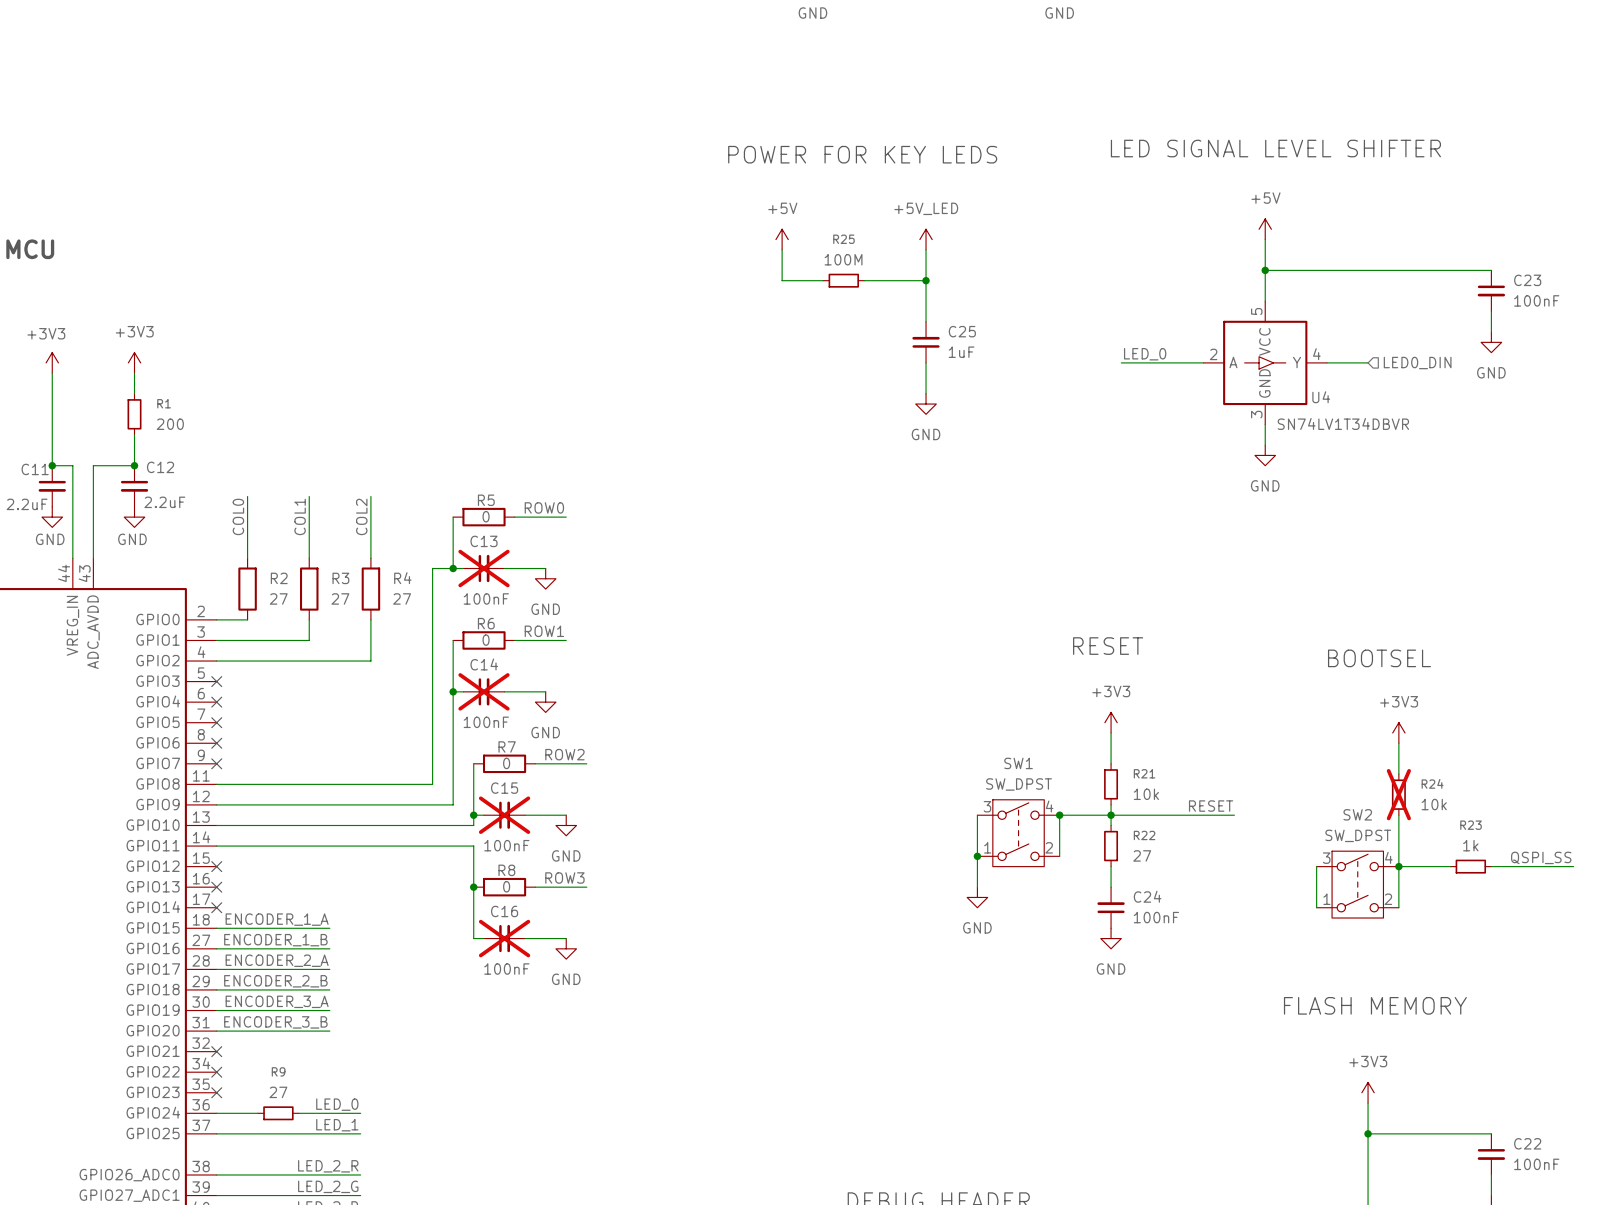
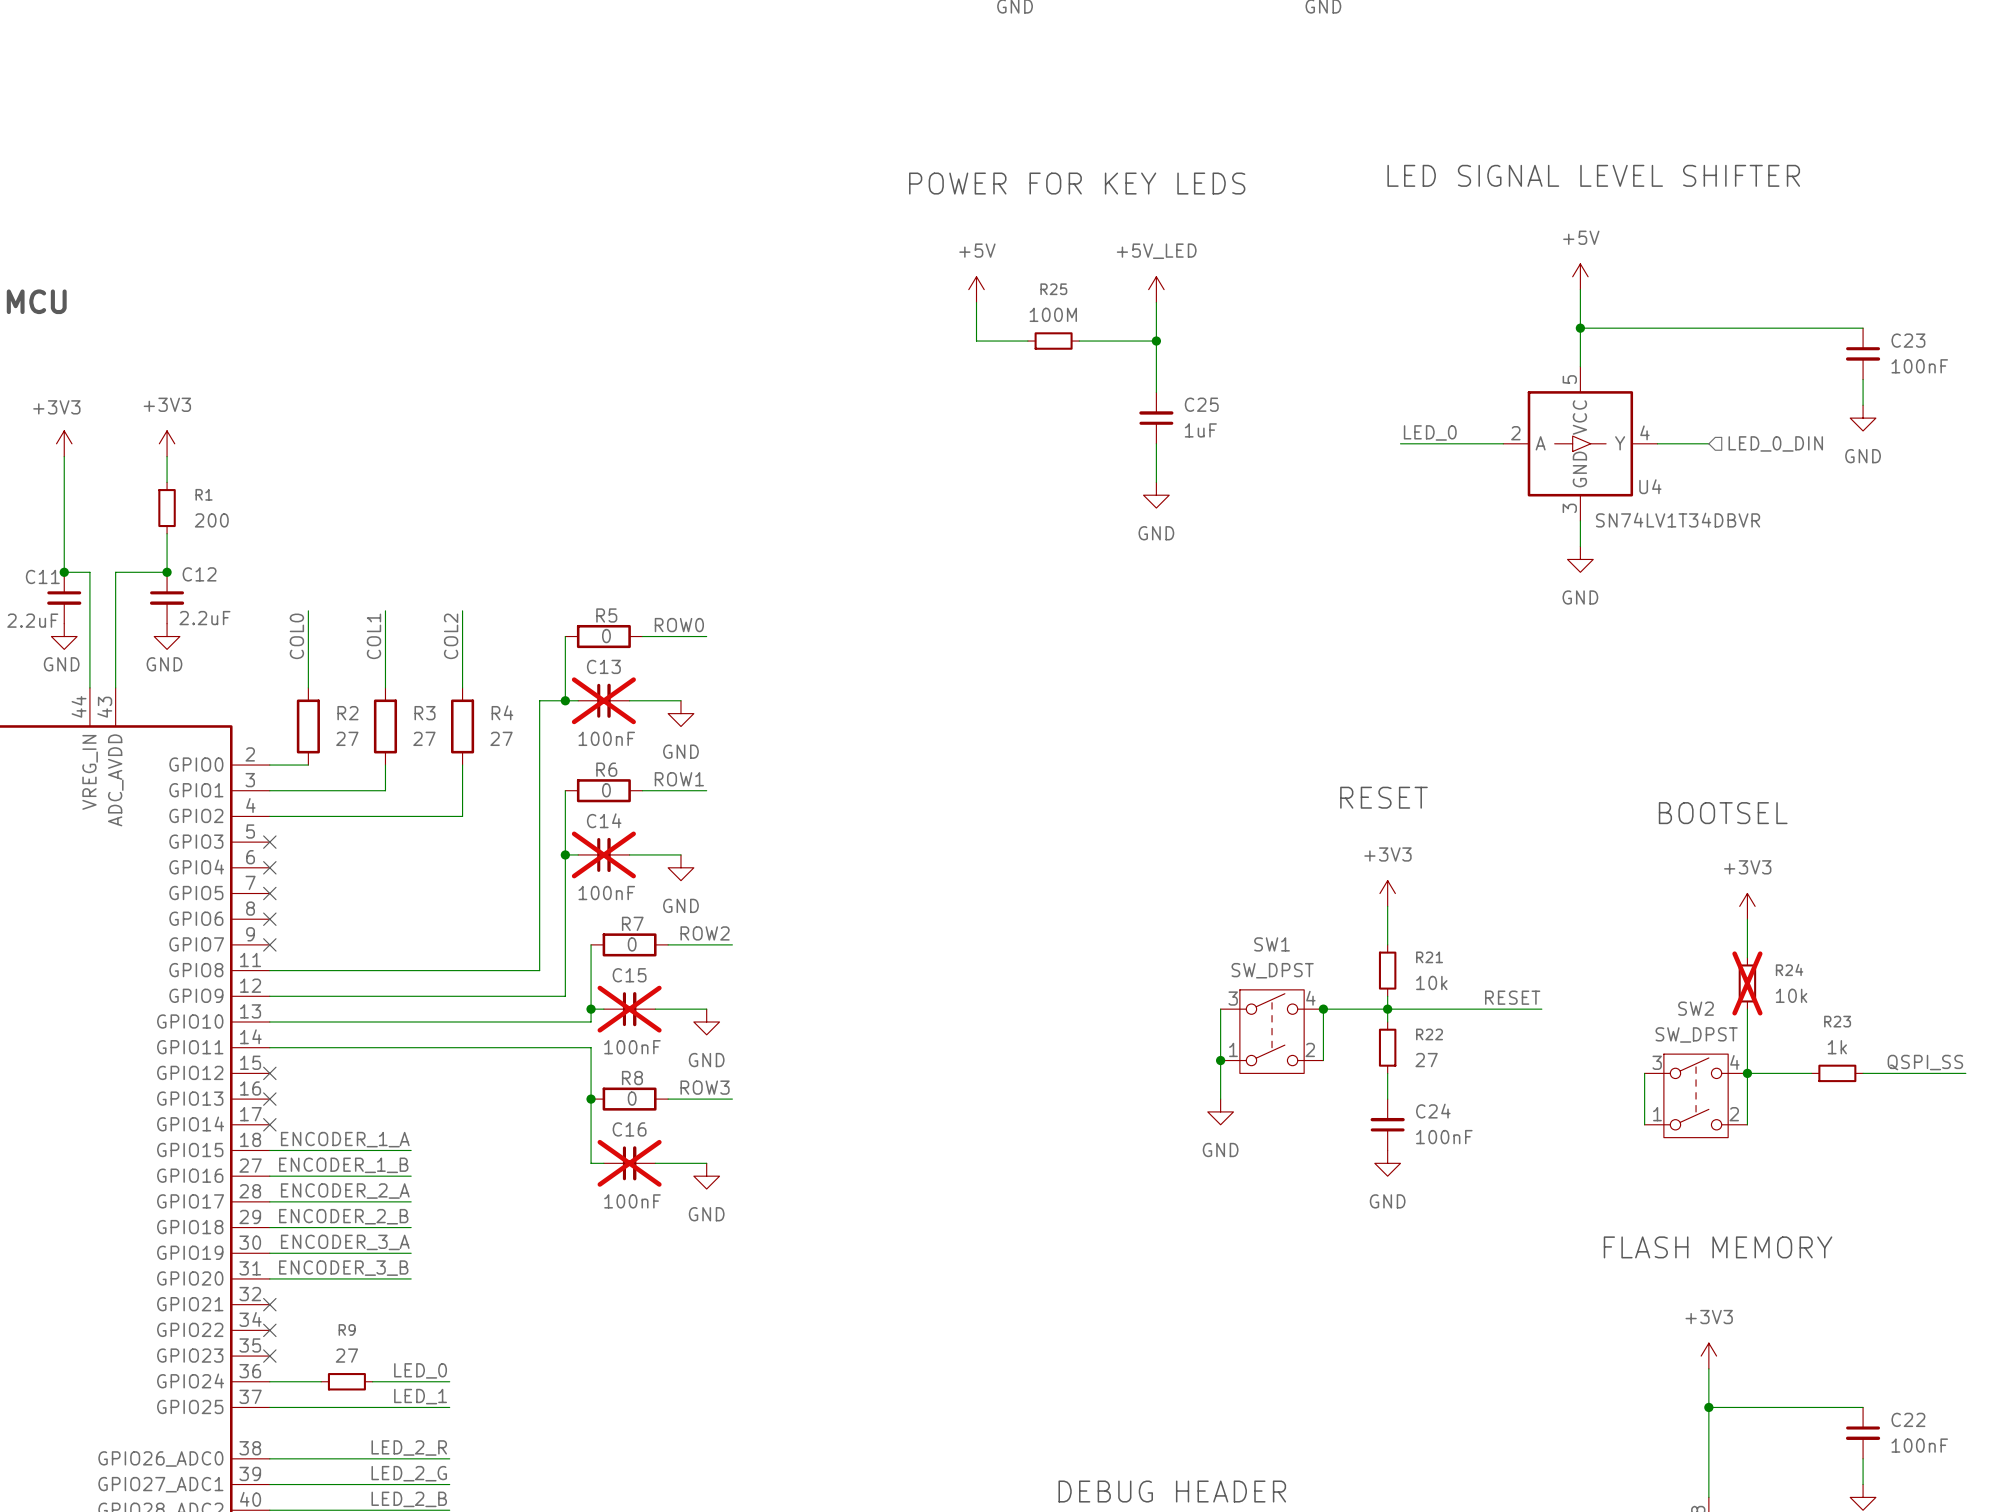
hierarchical label: LED0_DIN (1417, 363) -> LED_0_DIN (1775, 443)

